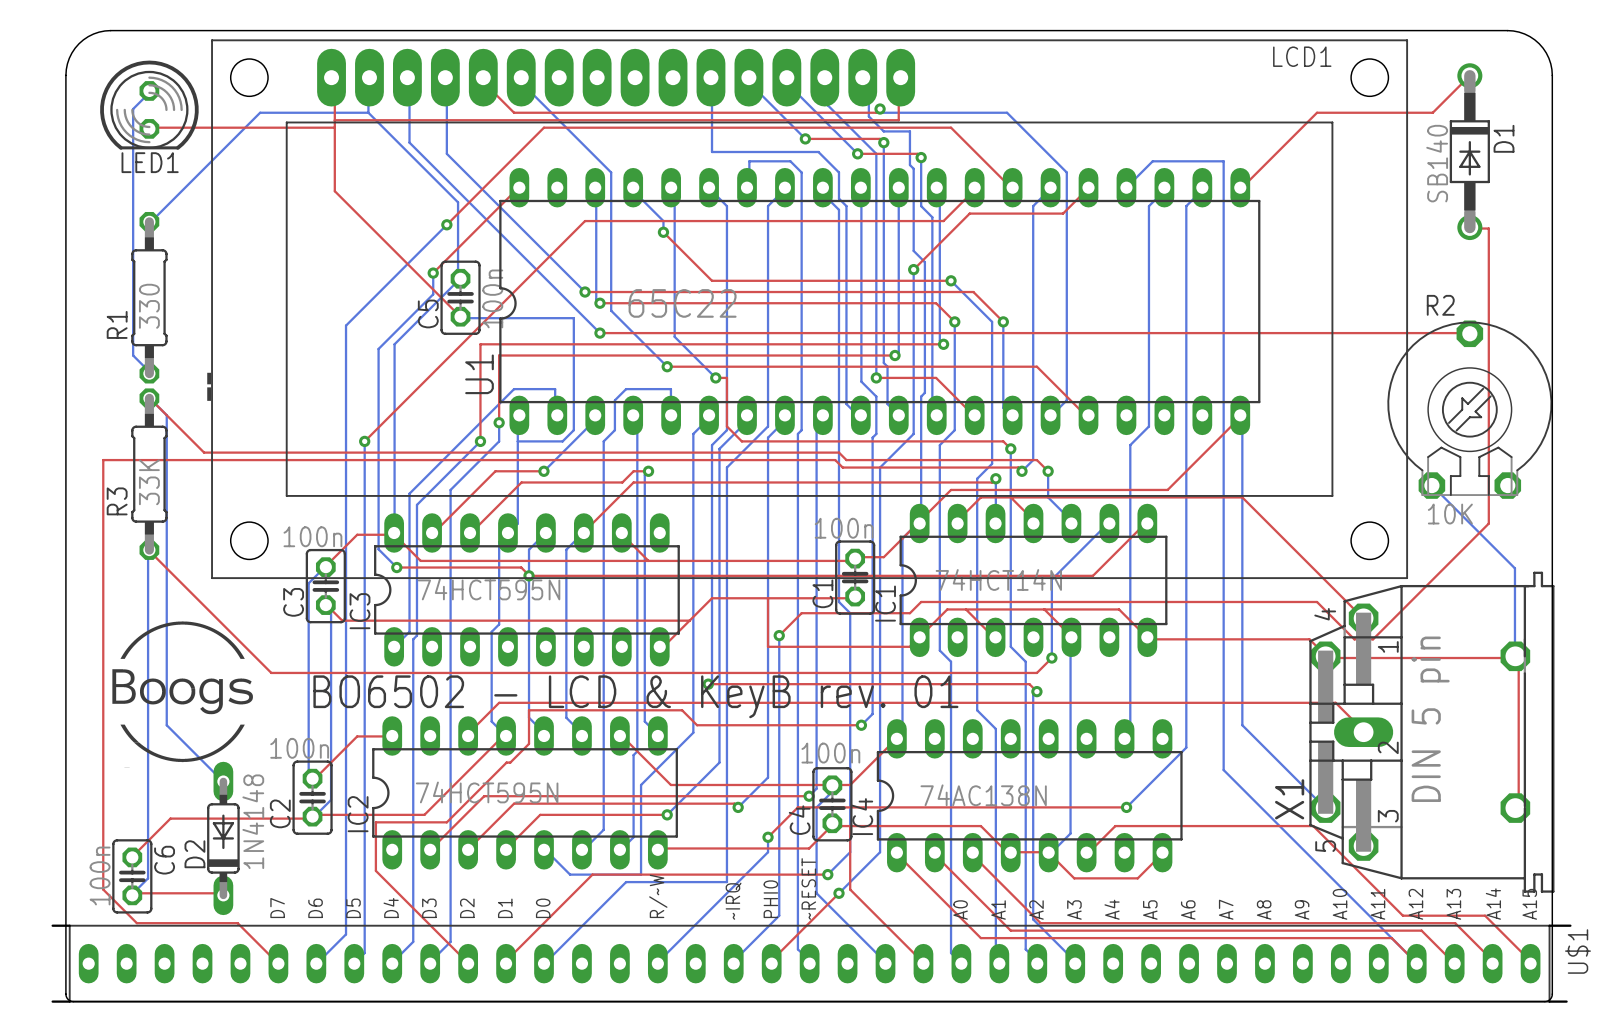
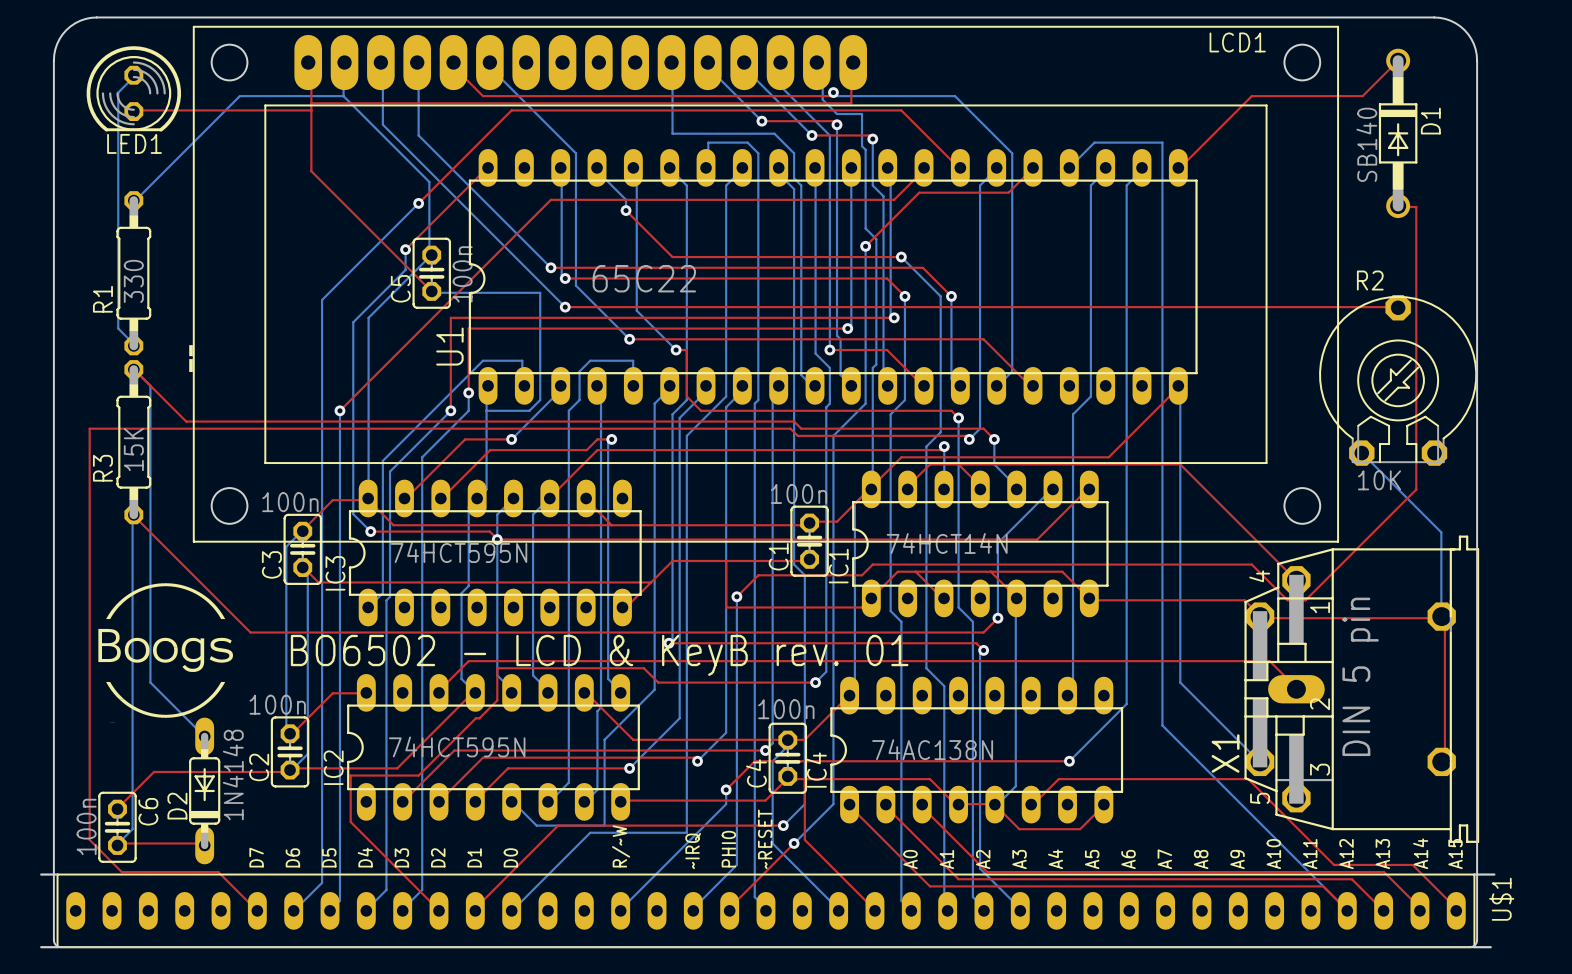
R3 value: 33K (149, 482) -> 15K (133, 449)

